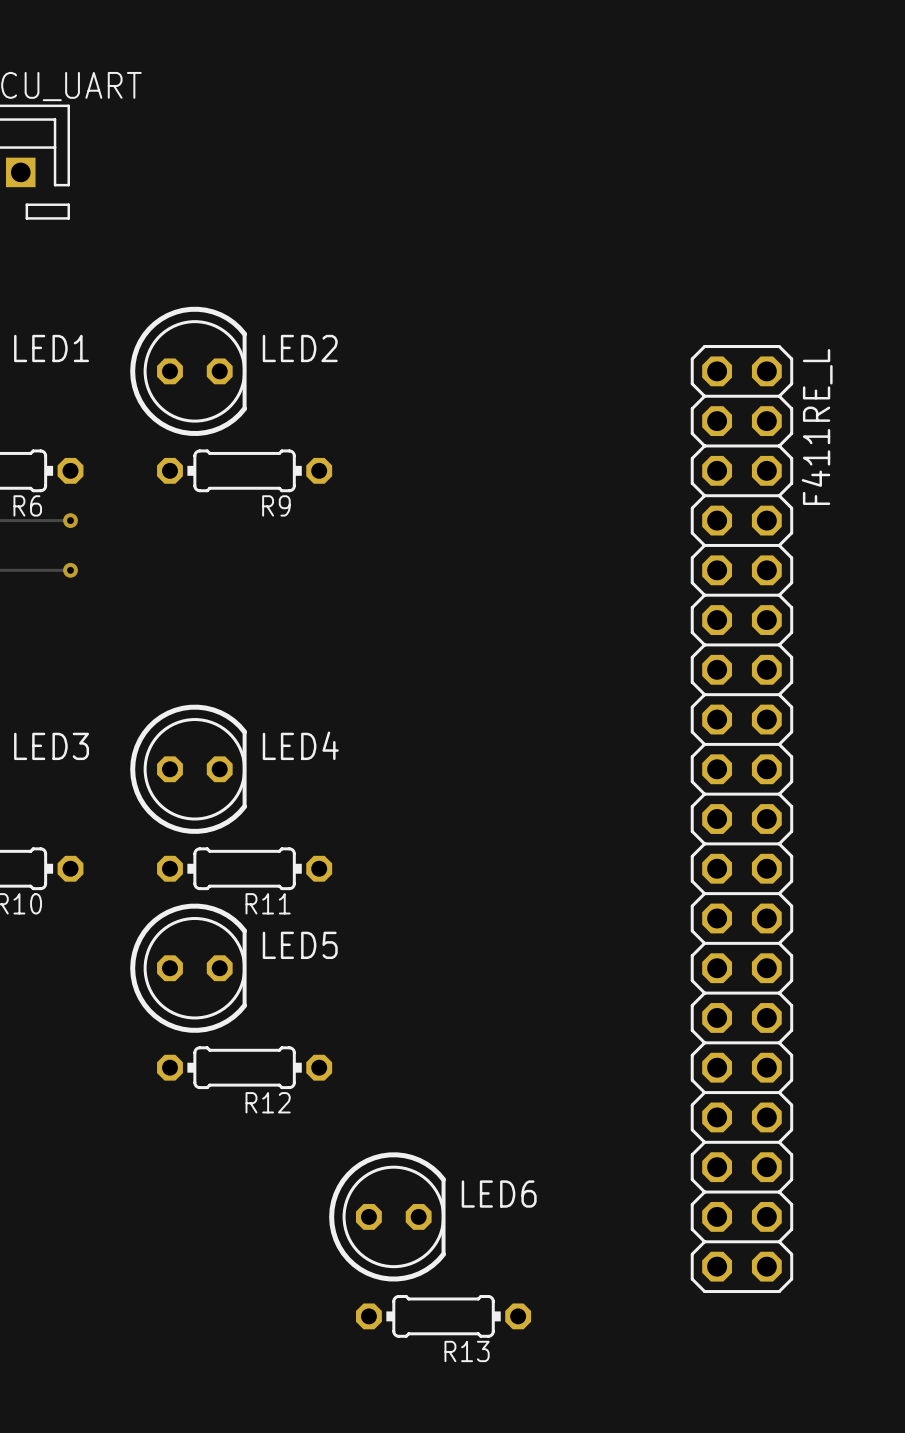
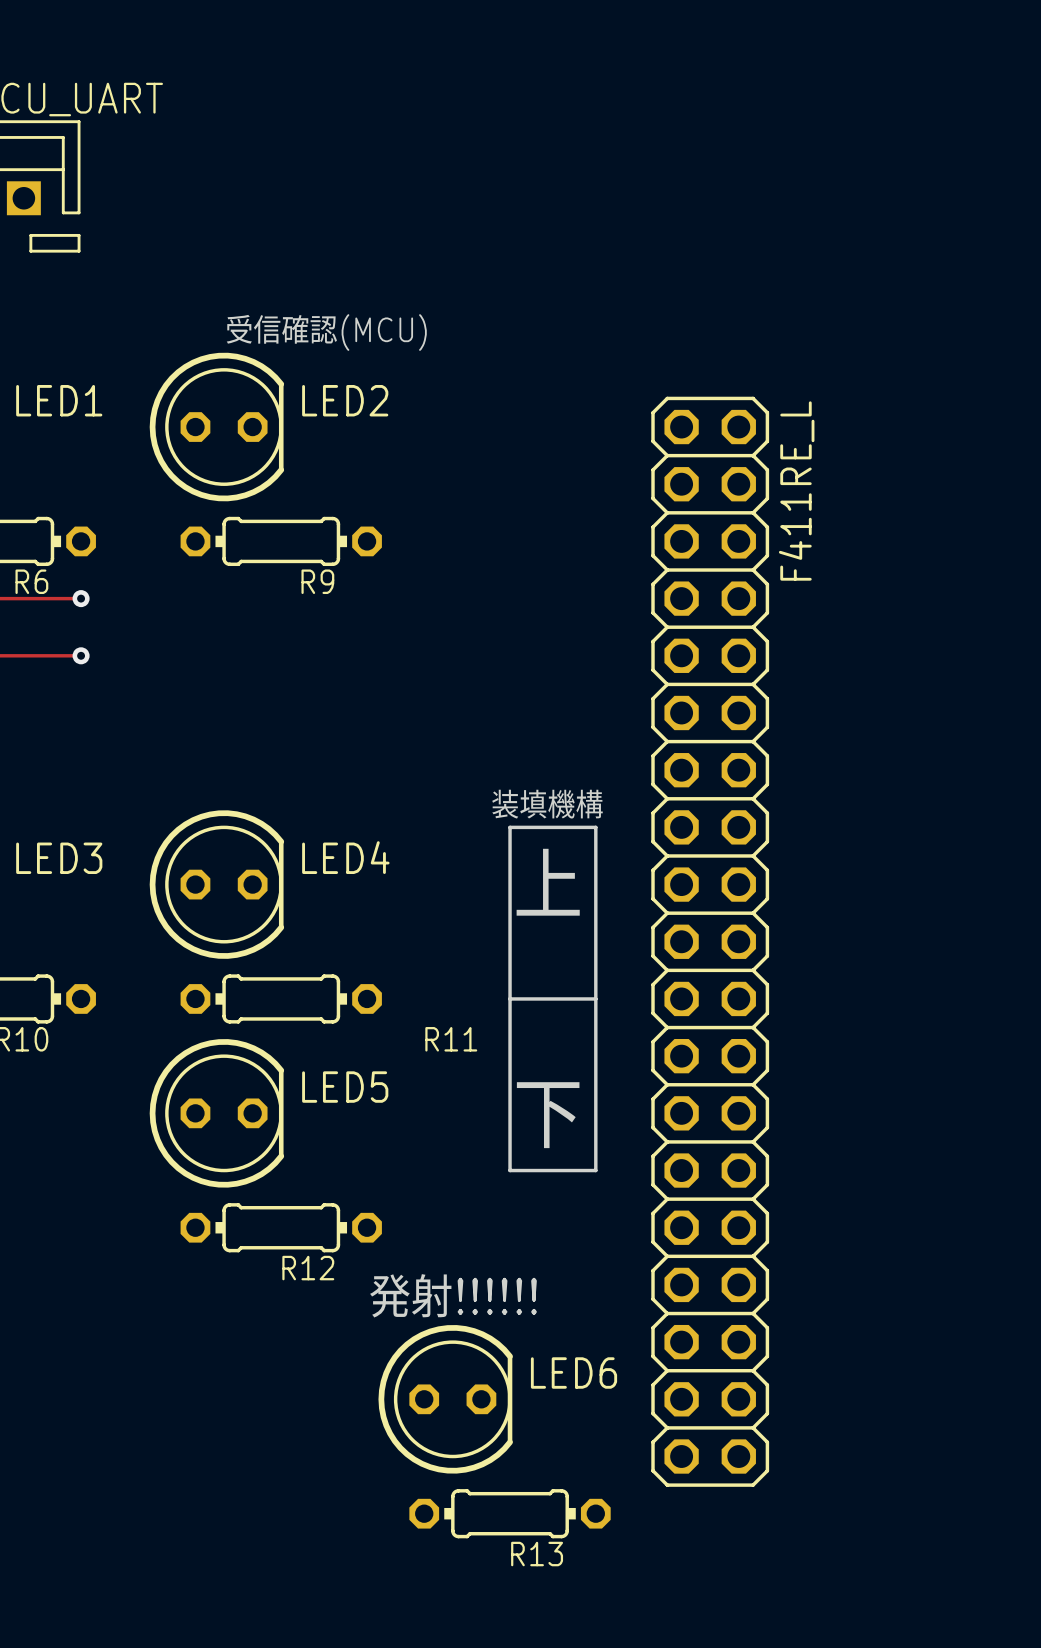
text: none -> 受信確認(MCU) (326, 332)
text: none -> 装填機構 (547, 804)
board edge: none -> (510, 827) (510, 1170) (595, 1170) (595, 827) (510, 827)
text: none -> 上 (548, 882)
F411RE_L position: (741, 819) -> (710, 941)
board edge: none -> (510, 998) (595, 998)
R11 name position: R11 (268, 903) -> R11 (451, 1039)
text: none -> 下 (548, 1115)
text: none -> 発射!!!!!! (452, 1295)

